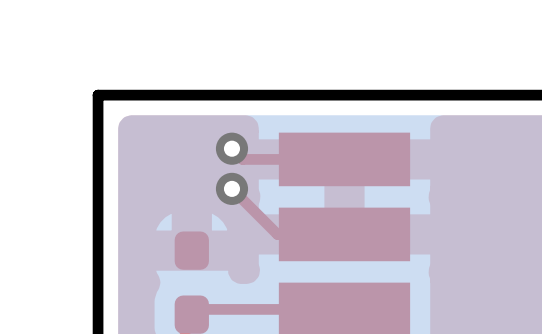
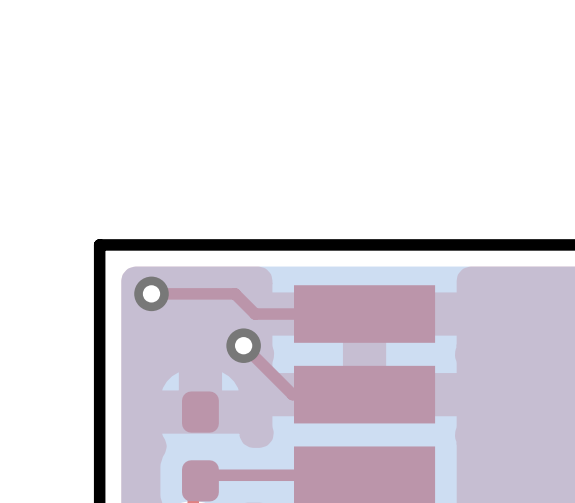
top track: none -> (151, 293) (234, 293) (243, 302)
via position: (231, 148) -> (151, 293)

